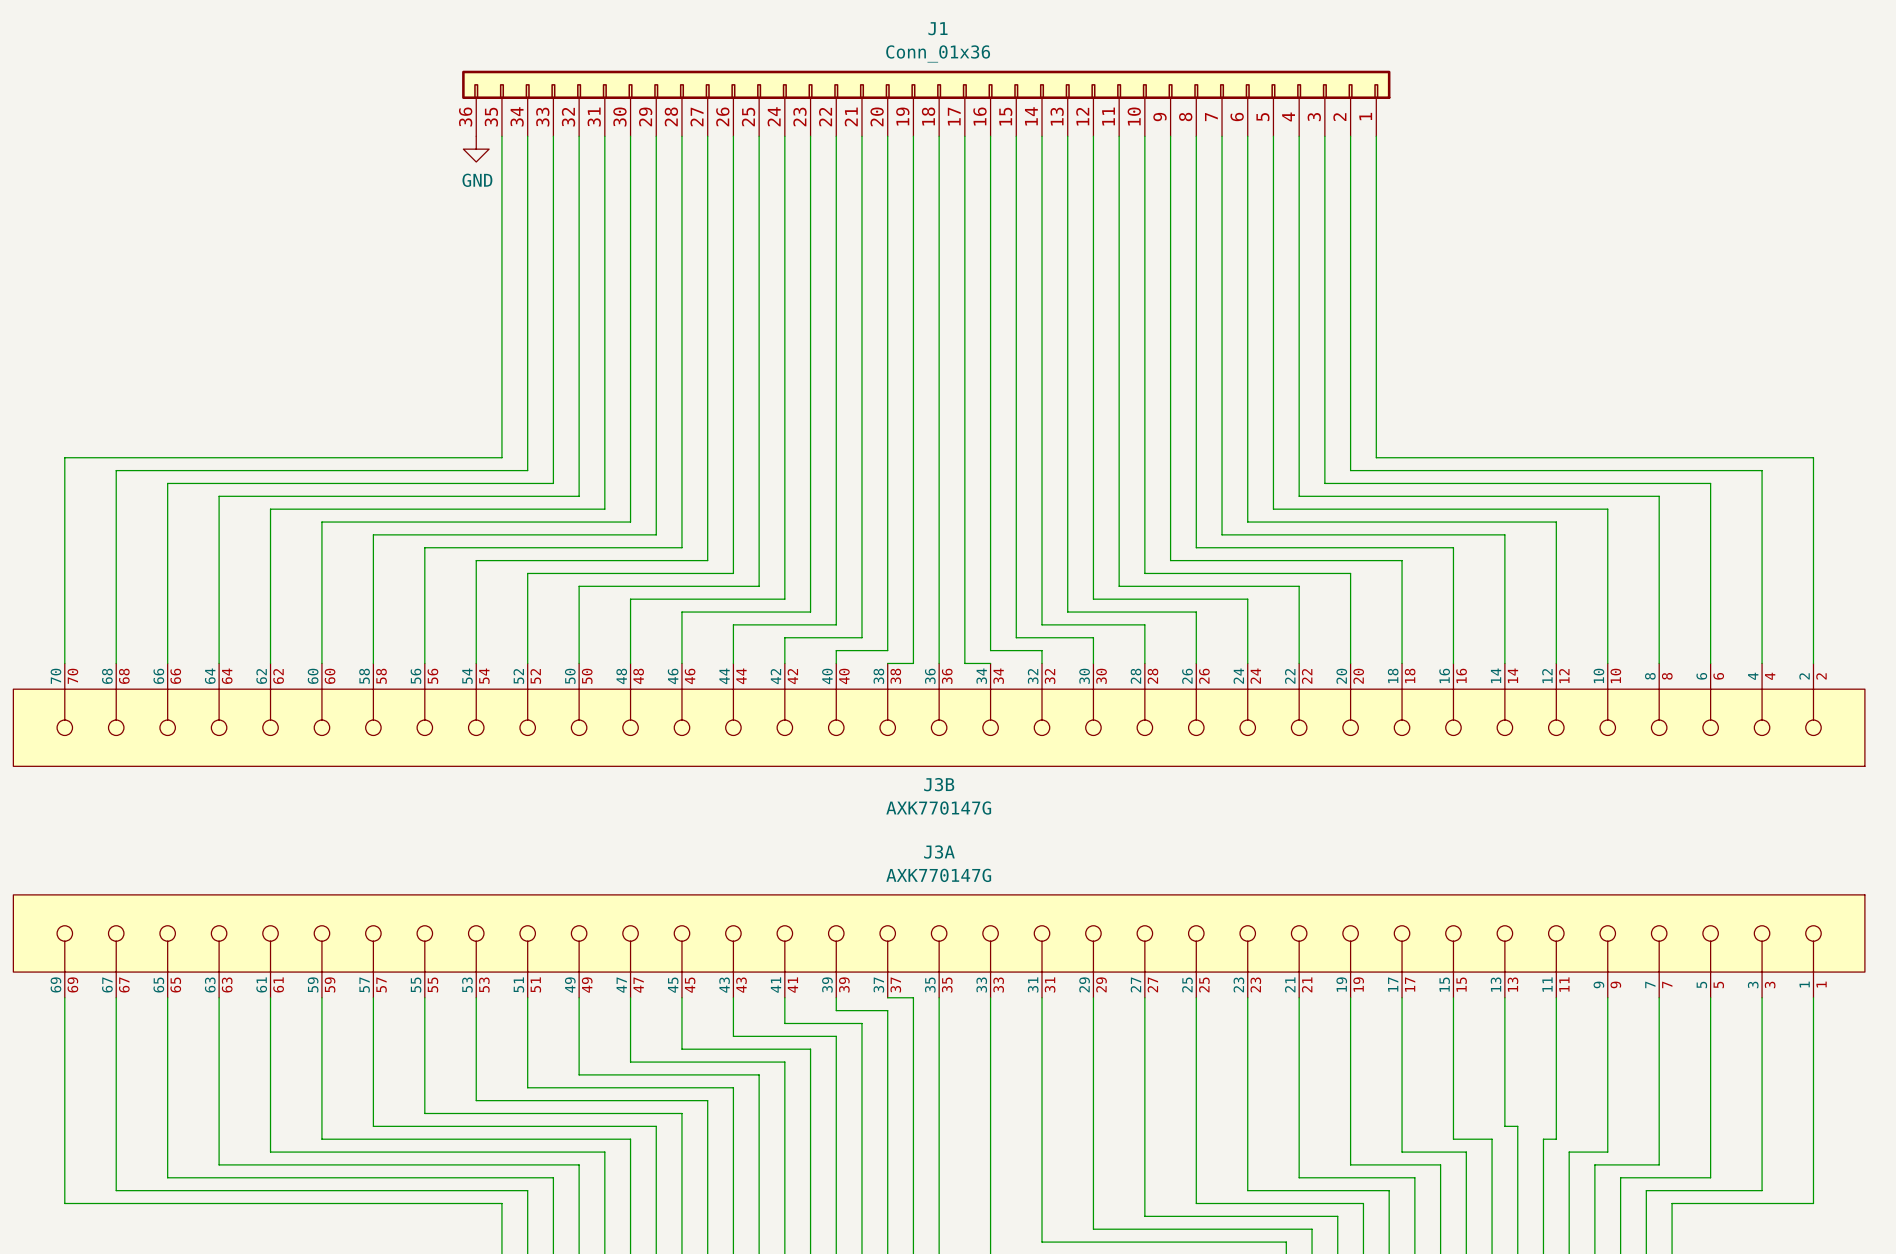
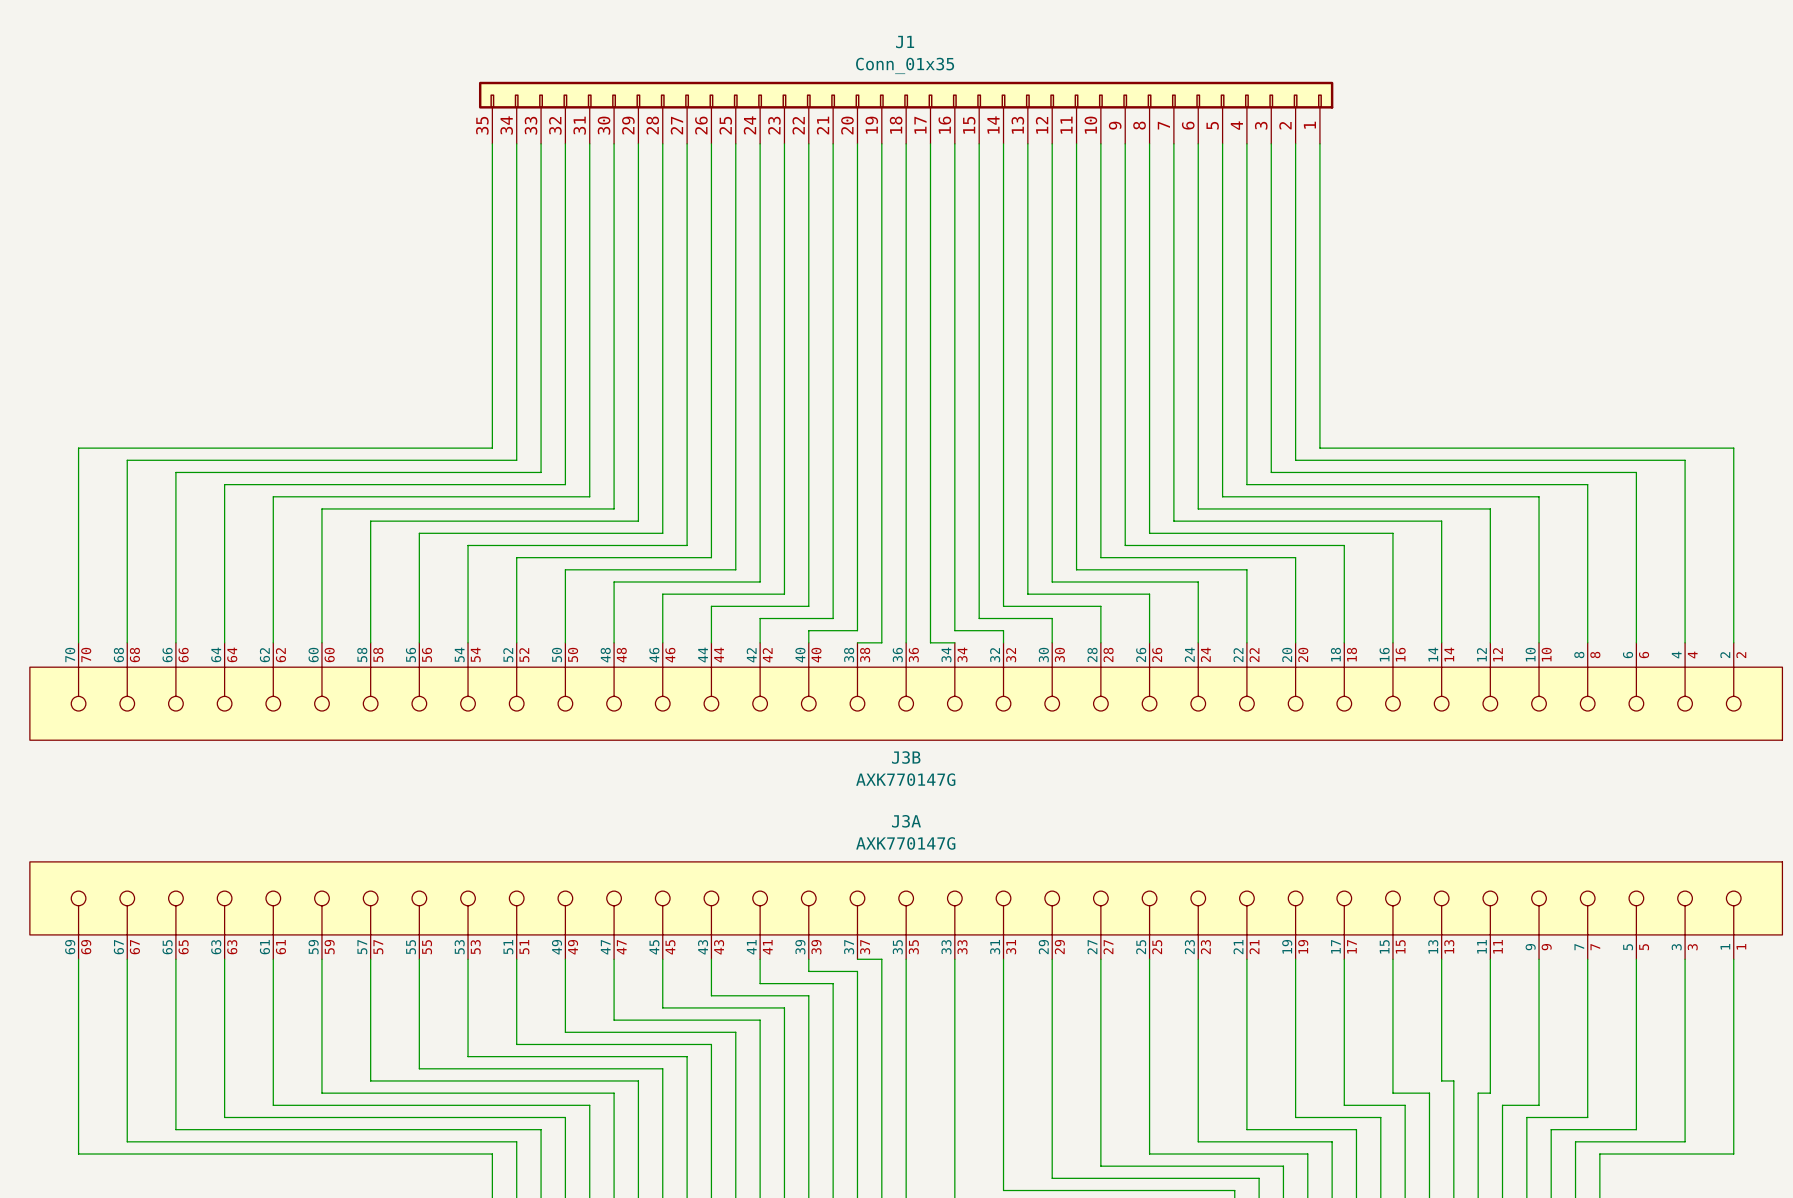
J1 value: Conn_01x36 (938, 53) -> Conn_01x35 (905, 65)
J1 symbol: [462, 70, 1391, 137] -> [478, 81, 1334, 144]
power symbol: GND (476, 149) -> none

